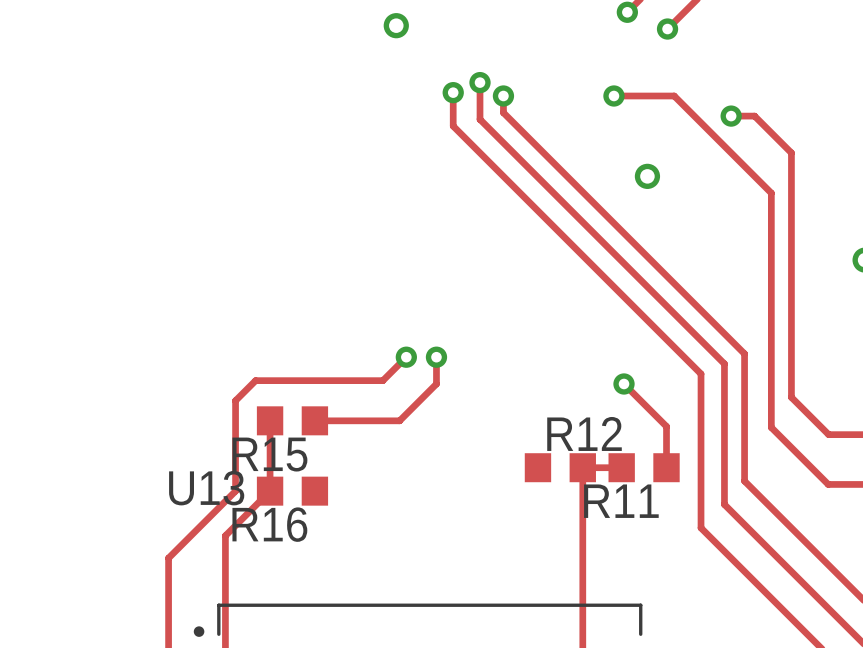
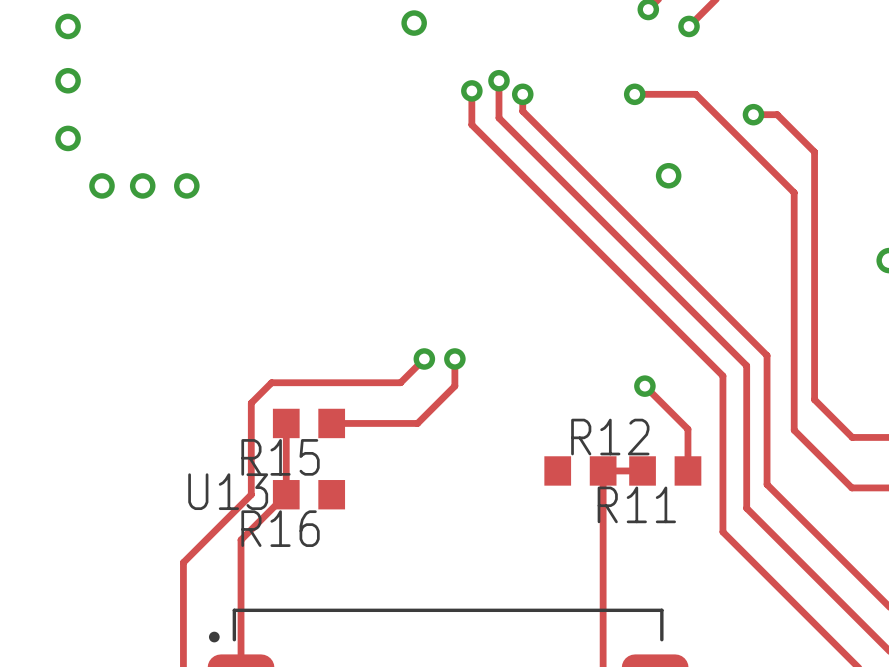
via: none -> (68, 26)
via: none -> (68, 80)
via: none -> (68, 138)
via: none -> (101, 185)
via: none -> (142, 185)
via: none -> (186, 185)

